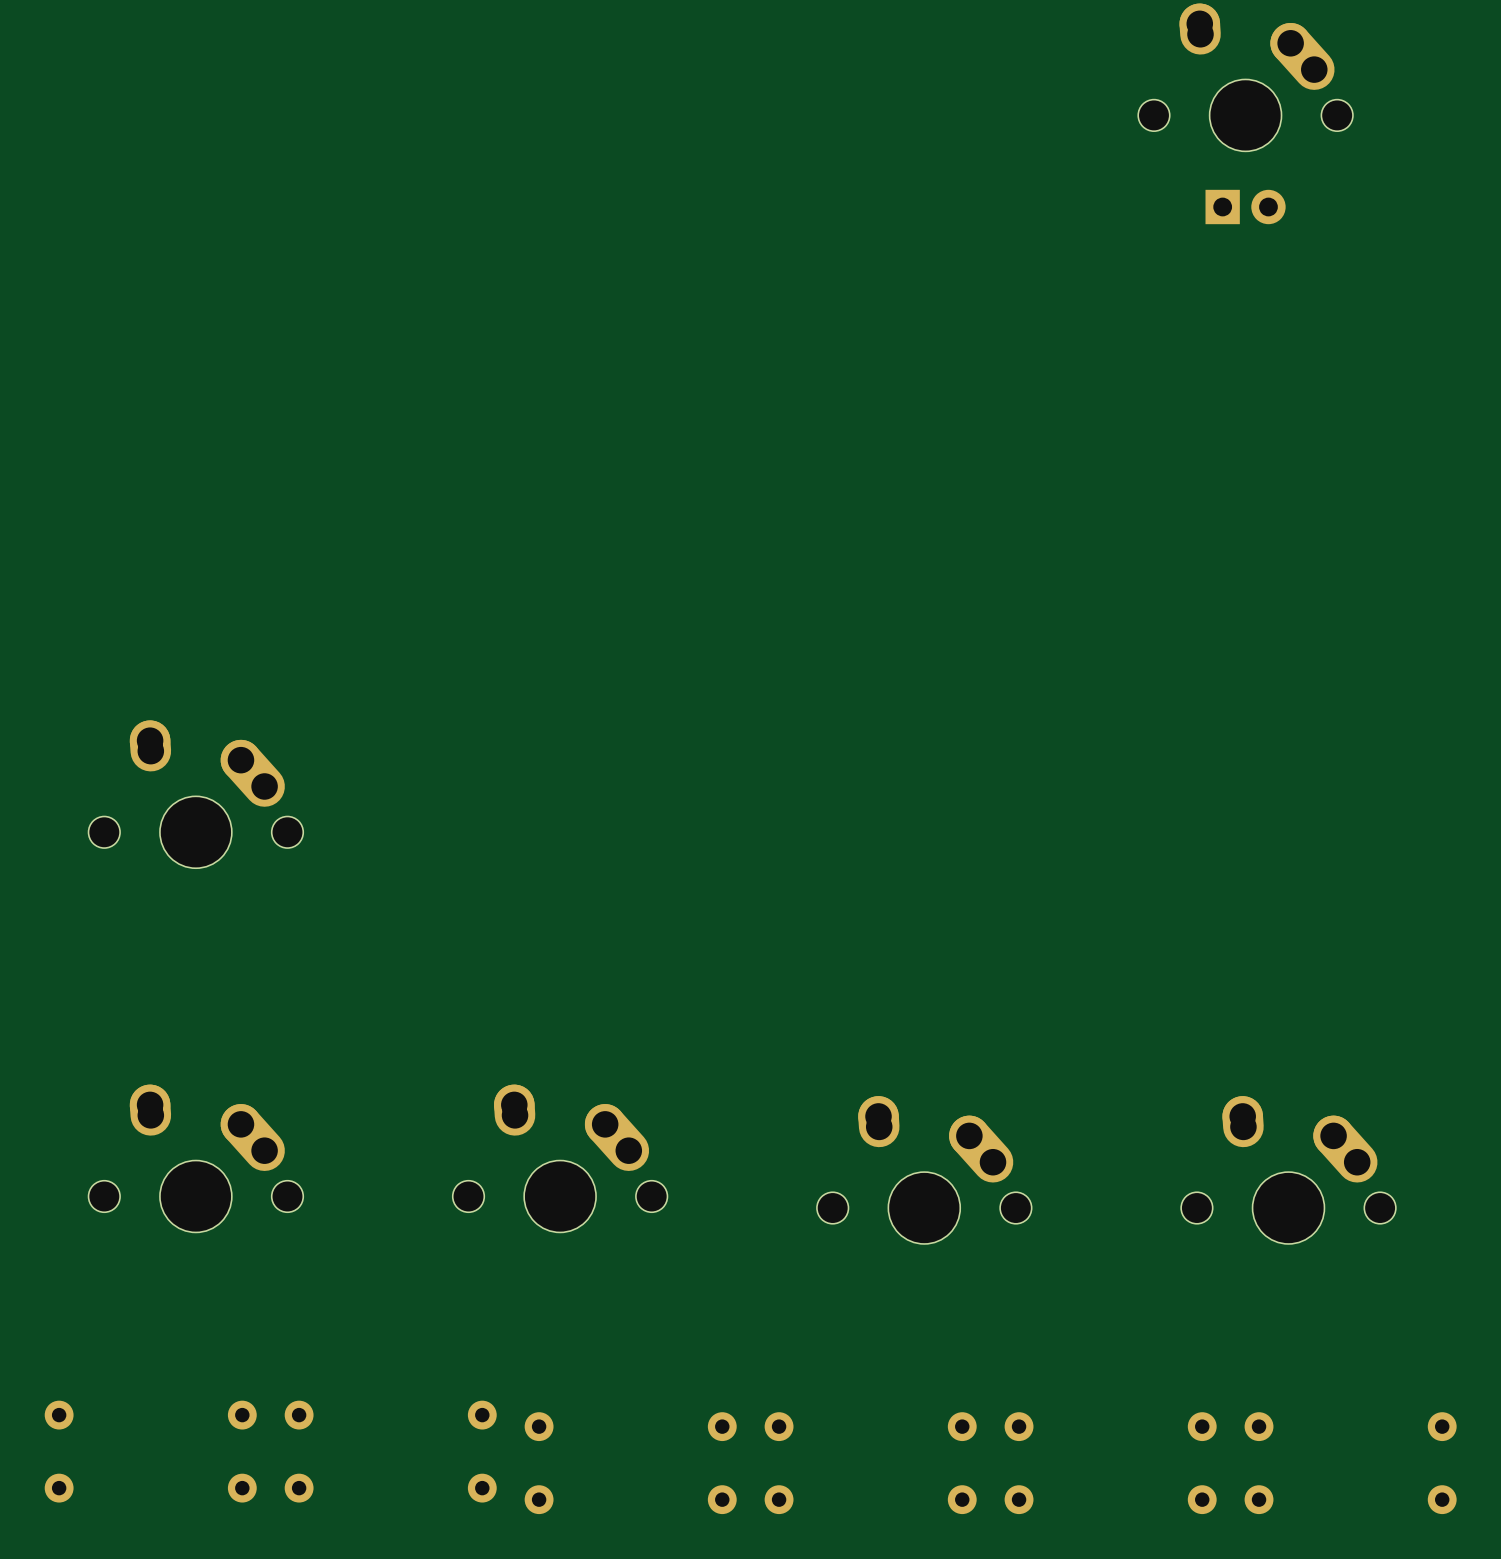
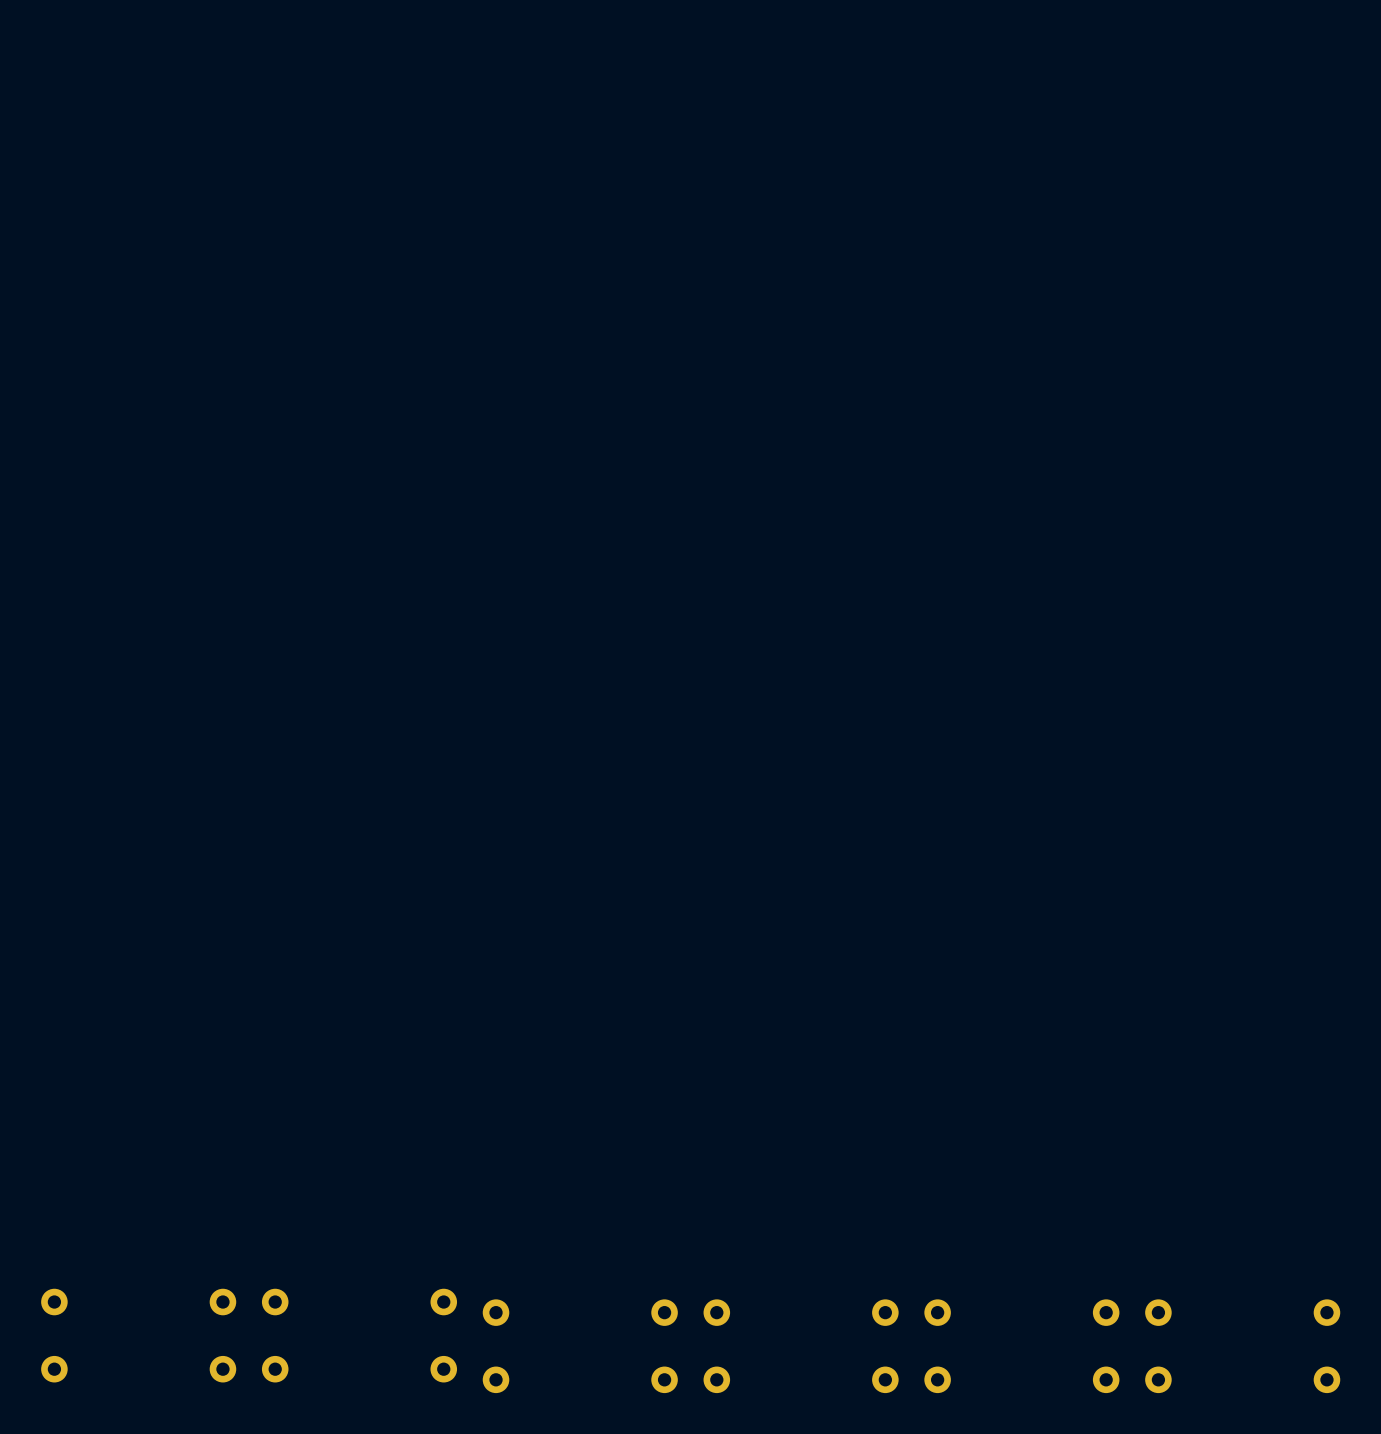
part: (1245, 113) -> none
part: (195, 794) -> none
part: (195, 1158) -> none
part: (560, 1158) -> none
part: (924, 1170) -> none
part: (1288, 1170) -> none

